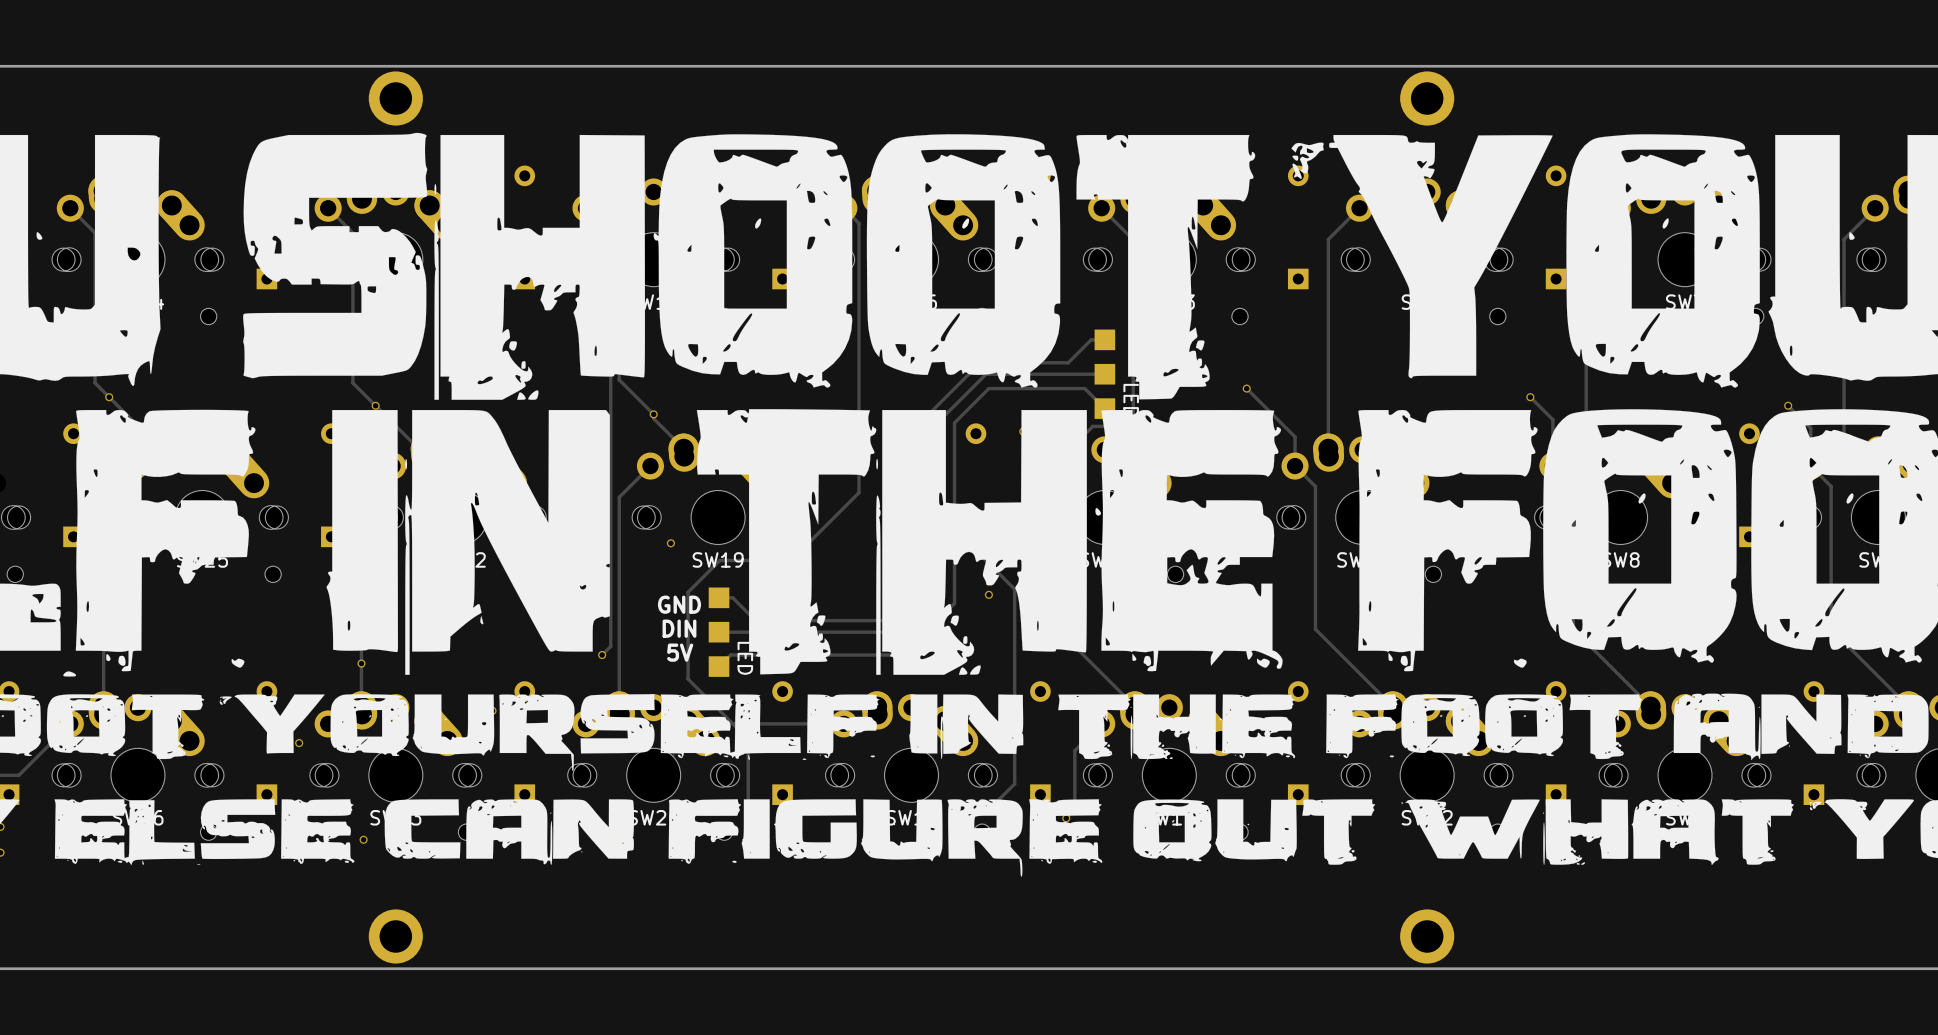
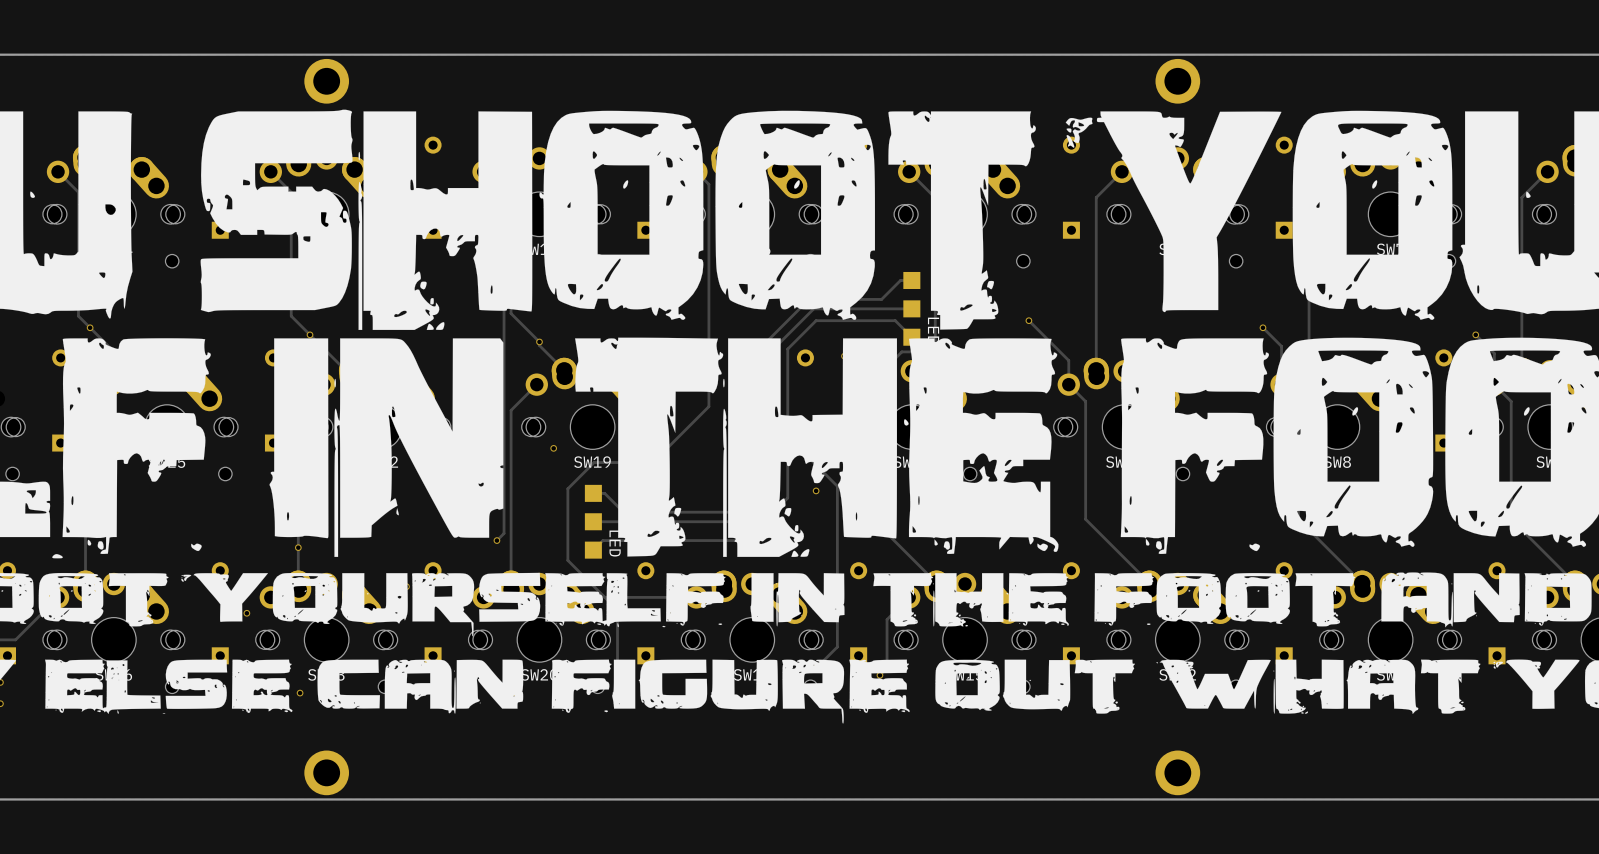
text: GND (679, 604) -> none
text: DIN (679, 628) -> none
text: 5V (680, 652) -> none

